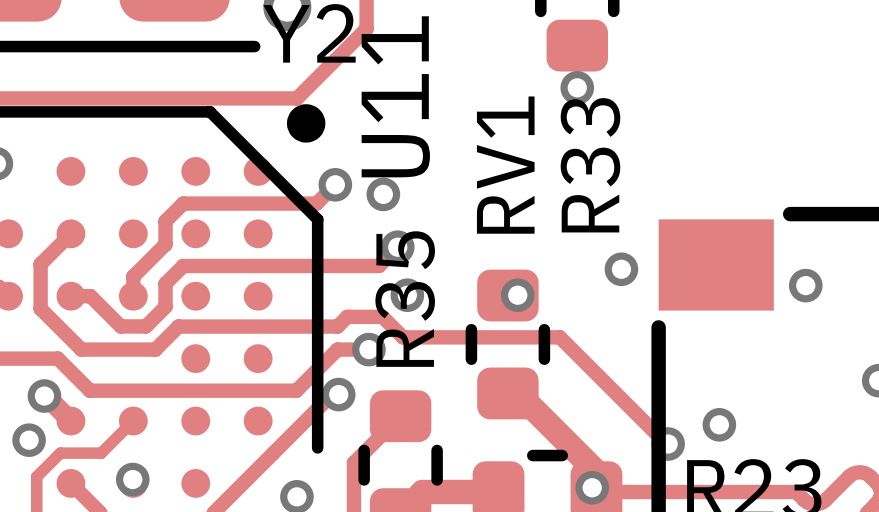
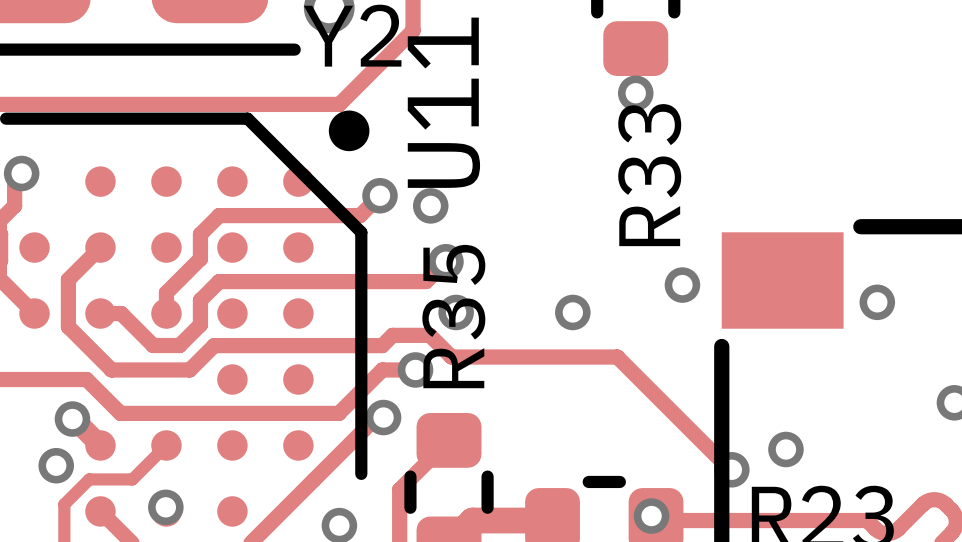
RV1: (507, 344) -> none
track: (518, 393) (596, 471) (596, 492) -> none

